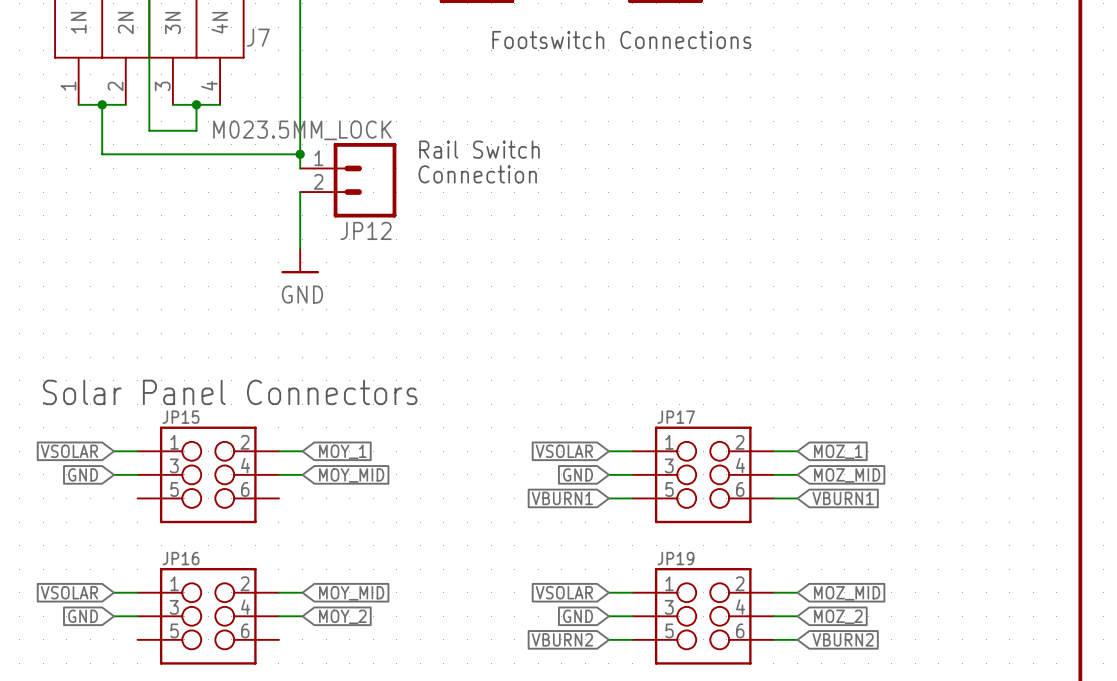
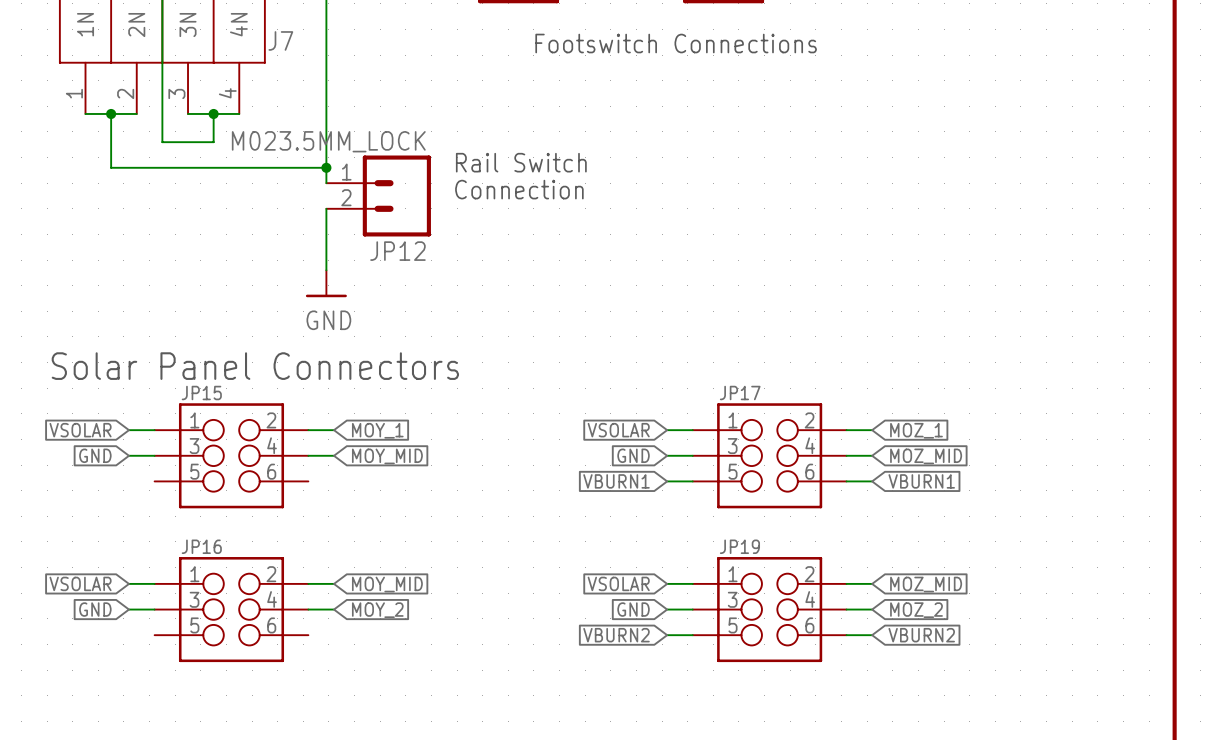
text position: Solar Panel Connectors (230, 392) -> Solar Panel Connectors (255, 366)
global label: none -> VSOLAR (80, 430)
global label: none -> VSOLAR (618, 430)
global label: none -> GND (95, 455)
global label: none -> MOY_MID (387, 456)
global label: none -> GND (633, 455)
global label: none -> MOZ_MID (926, 456)
global label: VSOLAR (69, 451) -> none
wire: (113, 451) (137, 451) -> (128, 430) (154, 430)
wire: (278, 451) (302, 451) -> (308, 430) (334, 430)
global label position: MOY_1 (342, 451) -> MOY_1 (377, 430)
global label: VSOLAR (564, 451) -> none
wire: (608, 451) (632, 451) -> (667, 430) (692, 430)
wire: (773, 451) (797, 451) -> (846, 430) (872, 430)
global label position: MOZ_1 (838, 451) -> MOZ_1 (916, 430)
global label: GND (83, 474) -> none
wire: (113, 474) (137, 474) -> (128, 455) (154, 455)
JP15 position: (208, 474) -> (231, 455)
wire: (278, 474) (302, 474) -> (308, 455) (334, 455)
global label: GND (578, 474) -> none
wire: (608, 474) (632, 474) -> (667, 455) (692, 455)
JP17 position: (703, 474) -> (769, 455)
wire: (773, 474) (797, 474) -> (846, 455) (872, 455)
global label: MOY_MID (351, 475) -> none
global label: MOZ_MID (847, 475) -> none
global label position: VBURN1 (562, 498) -> VBURN1 (616, 481)
wire: (608, 498) (632, 498) -> (667, 481) (692, 481)
wire: (773, 498) (797, 498) -> (846, 481) (872, 481)
global label position: VBURN1 (843, 498) -> VBURN1 (921, 481)
global label: none -> VSOLAR (80, 583)
global label: none -> MOY_MID (387, 584)
global label: none -> VSOLAR (618, 583)
global label: none -> MOZ_MID (926, 584)
global label: none -> GND (95, 609)
global label: none -> GND (633, 609)
global label: VSOLAR (69, 592) -> none
wire: (113, 592) (137, 592) -> (128, 583) (154, 583)
wire: (278, 592) (302, 592) -> (308, 583) (334, 583)
global label: VSOLAR (564, 592) -> none
wire: (608, 592) (632, 592) -> (667, 583) (692, 583)
wire: (773, 592) (797, 592) -> (846, 583) (872, 583)
global label: MOY_MID (351, 593) -> none
global label: MOZ_MID (847, 593) -> none
global label: GND (83, 616) -> none
wire: (113, 616) (137, 616) -> (128, 609) (154, 609)
JP16 position: (208, 616) -> (231, 609)
wire: (278, 616) (302, 616) -> (308, 609) (334, 609)
global label position: MOY_2 (342, 616) -> MOY_2 (377, 610)
global label: GND (578, 616) -> none
wire: (608, 616) (632, 616) -> (667, 609) (692, 609)
JP19 position: (703, 616) -> (769, 609)
wire: (773, 616) (797, 616) -> (846, 609) (872, 609)
global label position: MOZ_2 (838, 616) -> MOZ_2 (916, 610)
global label position: VBURN2 (562, 639) -> VBURN2 (616, 635)
wire: (608, 639) (632, 639) -> (667, 635) (692, 635)
wire: (773, 639) (797, 639) -> (846, 635) (872, 635)
global label position: VBURN2 (843, 639) -> VBURN2 (921, 635)

